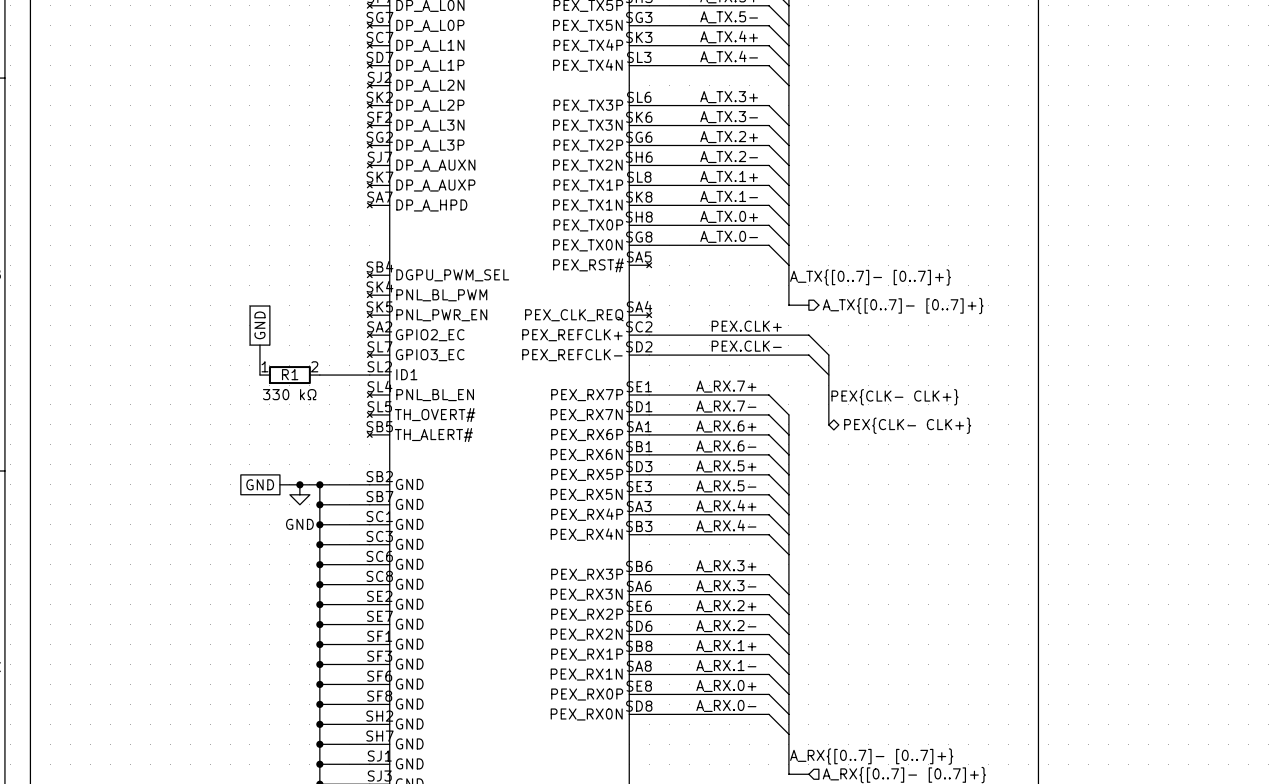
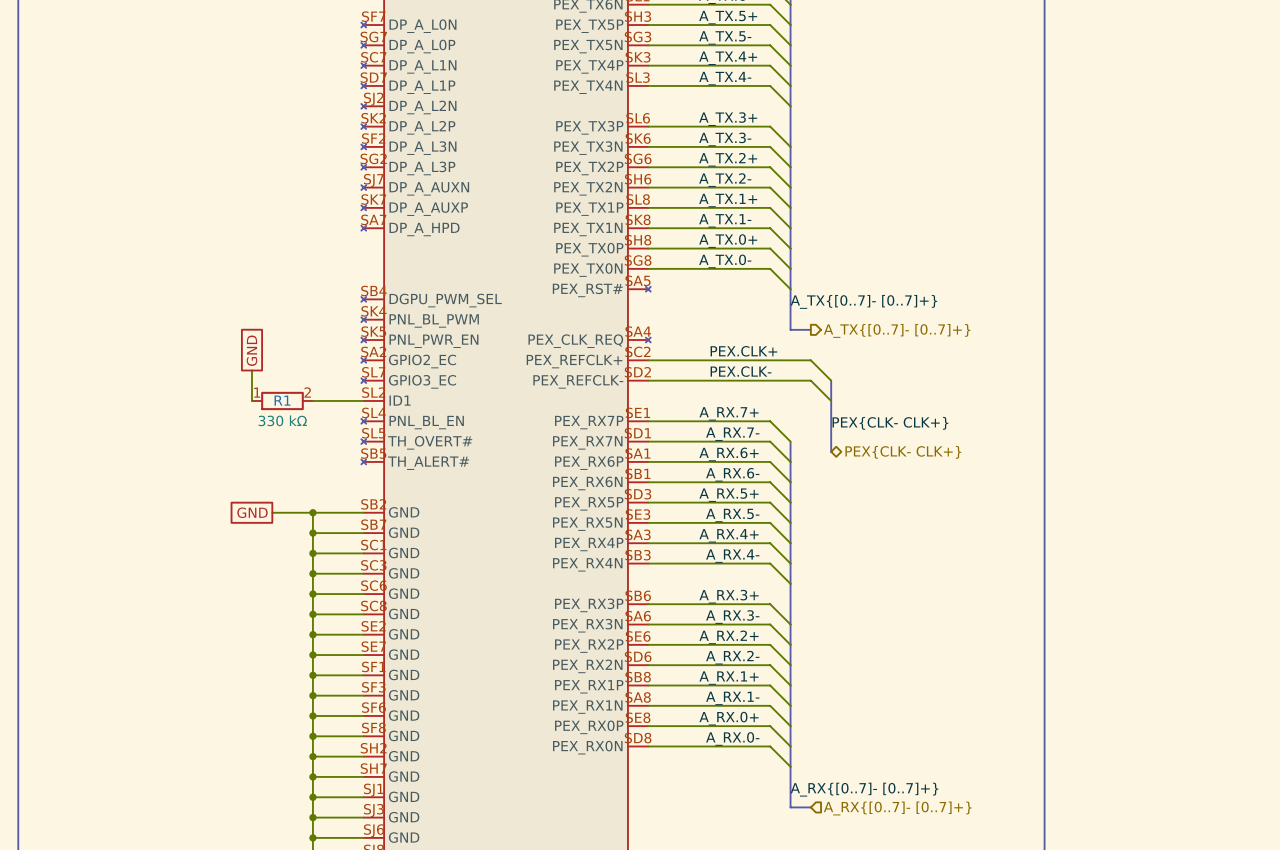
junction: (299, 484) -> none
power symbol: GND (299, 494) -> none

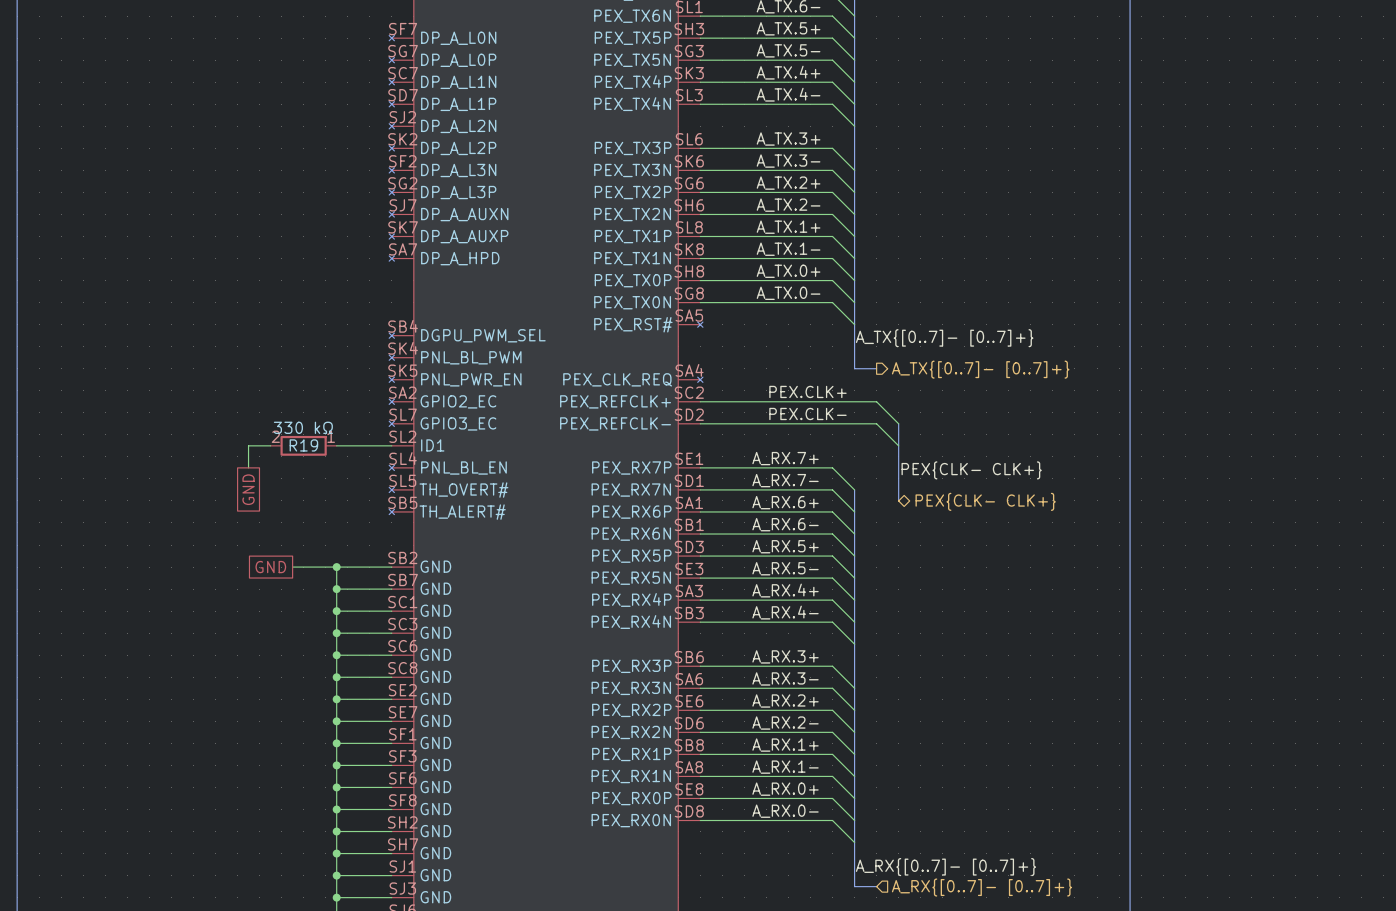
global label rotation: 0° (252, 350) -> 180° (248, 489)
global label position: GND (252, 350) -> GND (248, 489)
wire: (251, 370) (251, 400) -> (248, 467) (248, 445) (270, 445)
R1 rotation: 0° (282, 400) -> 180° (303, 445)
R1 name: R1 (282, 400) -> R19 (303, 445)

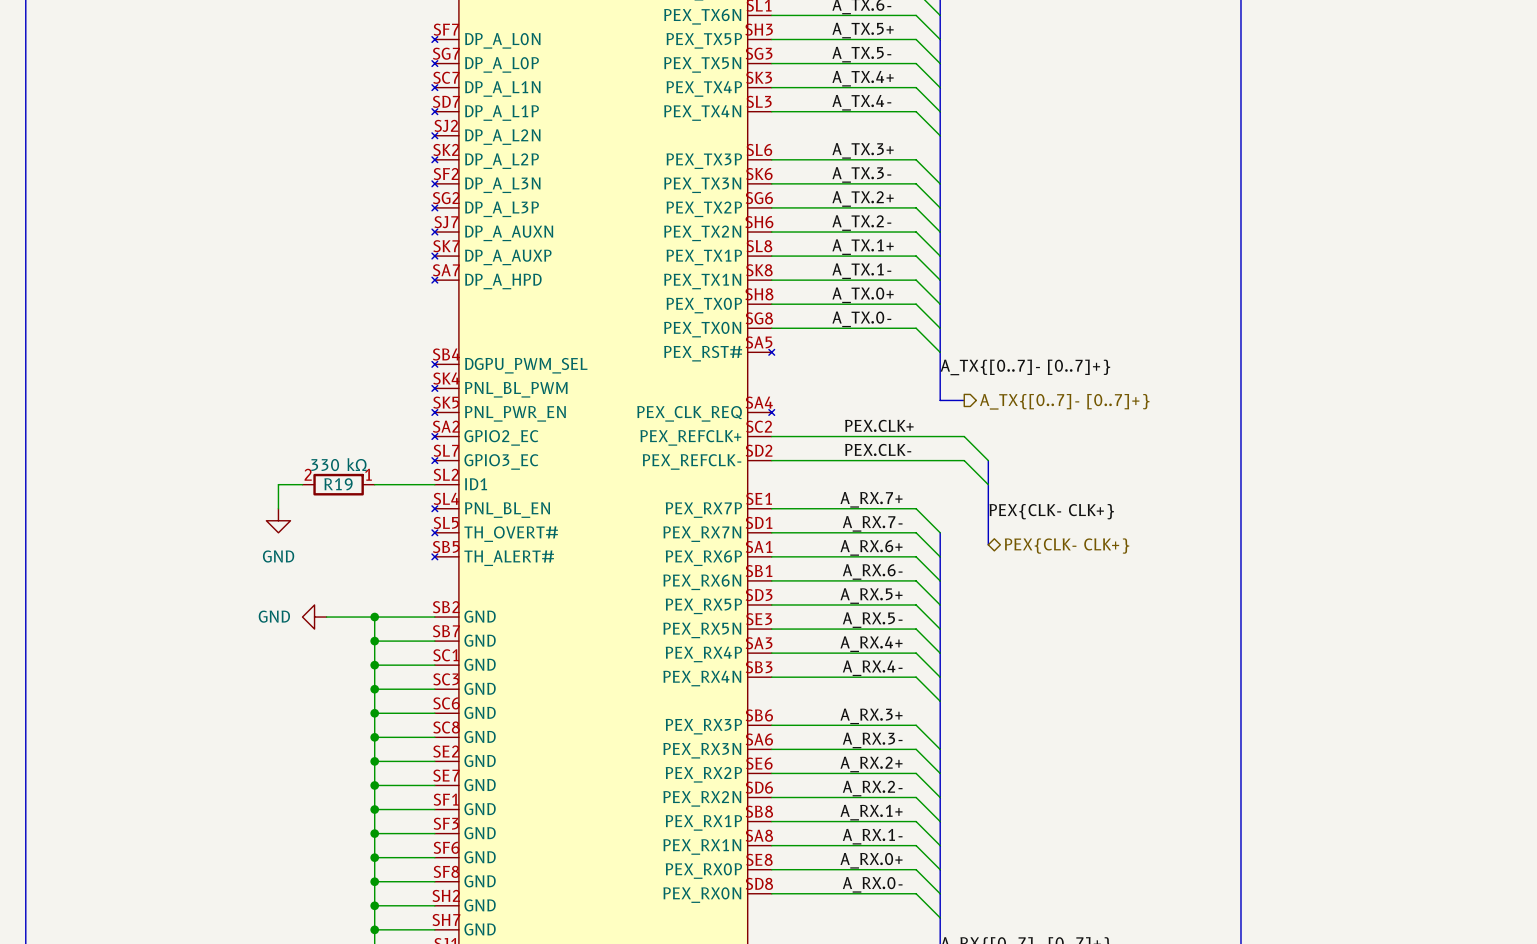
power symbol: none -> GND (278, 520)
global label: GND (248, 489) -> none
global label: GND (270, 567) -> none
power symbol: none -> GND (314, 617)

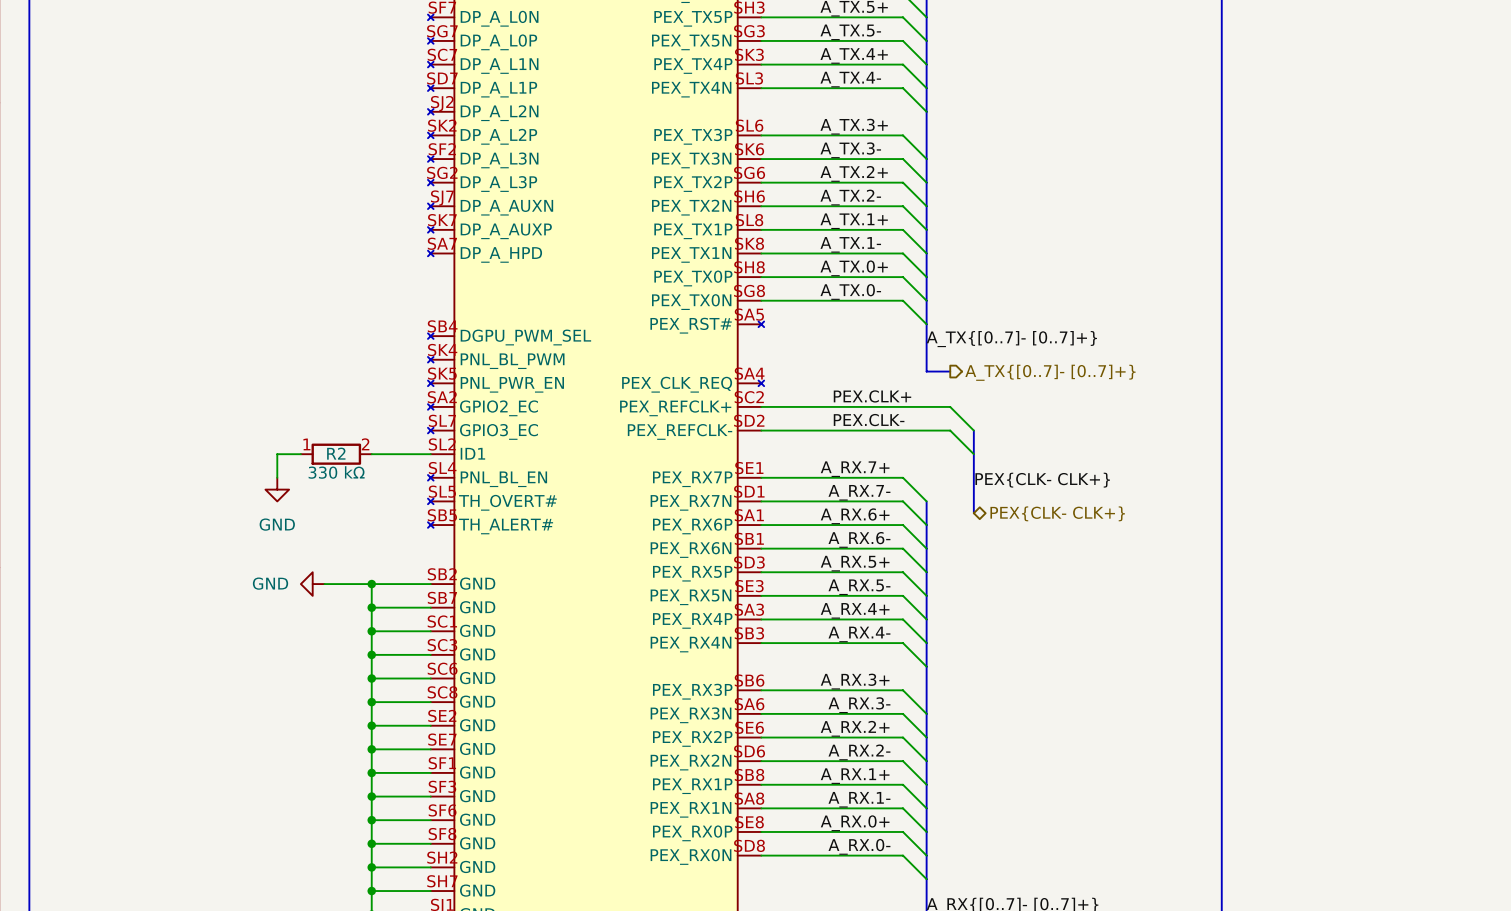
R19 rotation: 0° (338, 484) -> 180° (336, 454)
R19 name: R19 (338, 484) -> R2 (336, 453)

